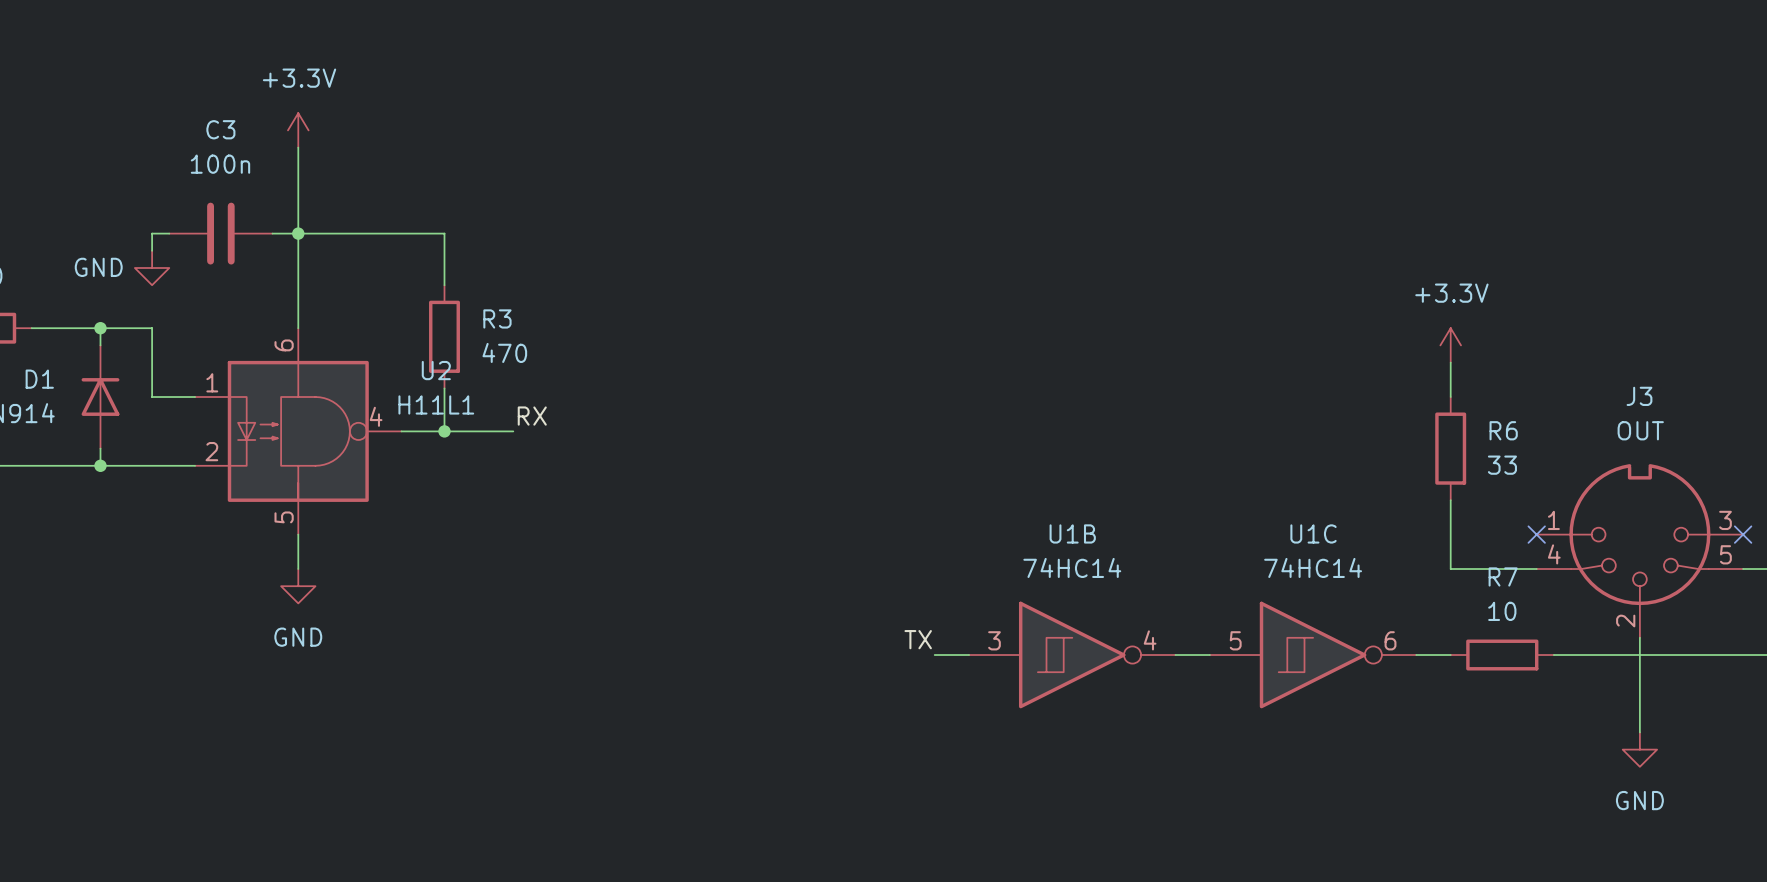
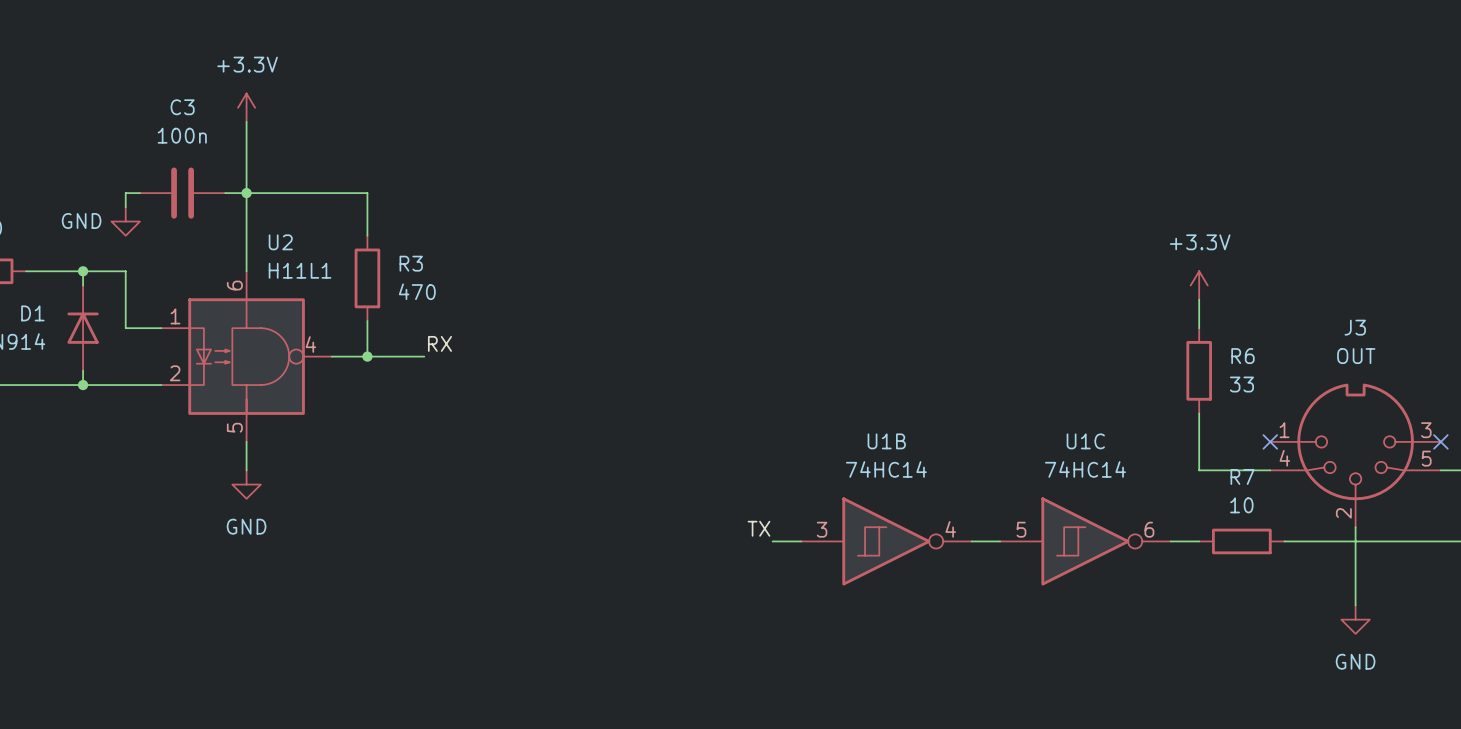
U2 name position: U2 (436, 370) -> U2 (280, 242)
U2 value position: H11L1 (436, 404) -> H11L1 (300, 270)

